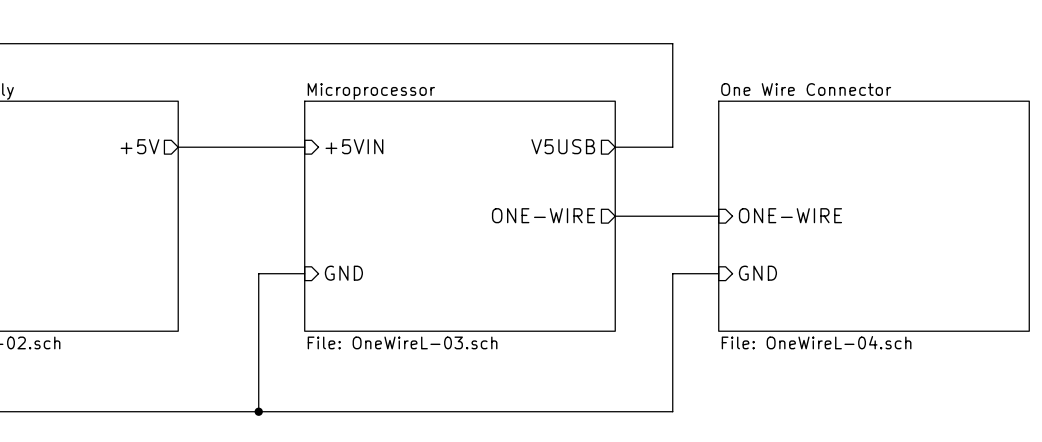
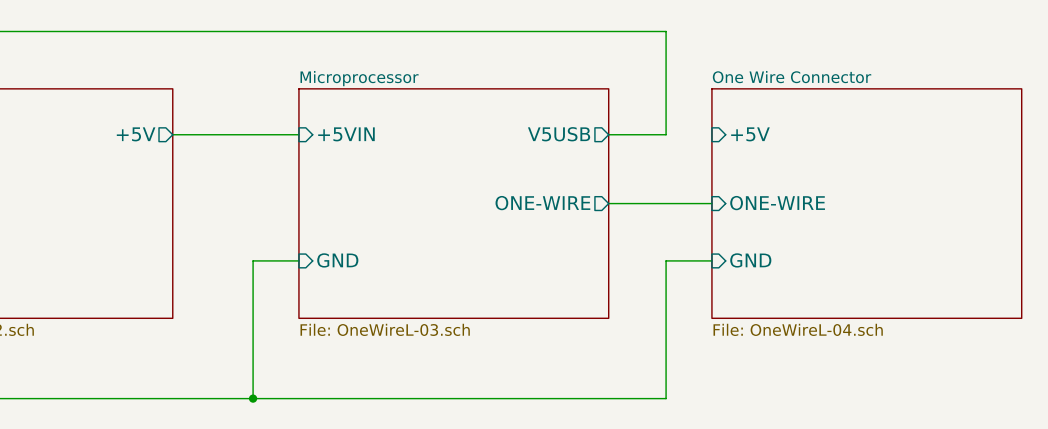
sheet pin: none -> +5V (750, 134)

